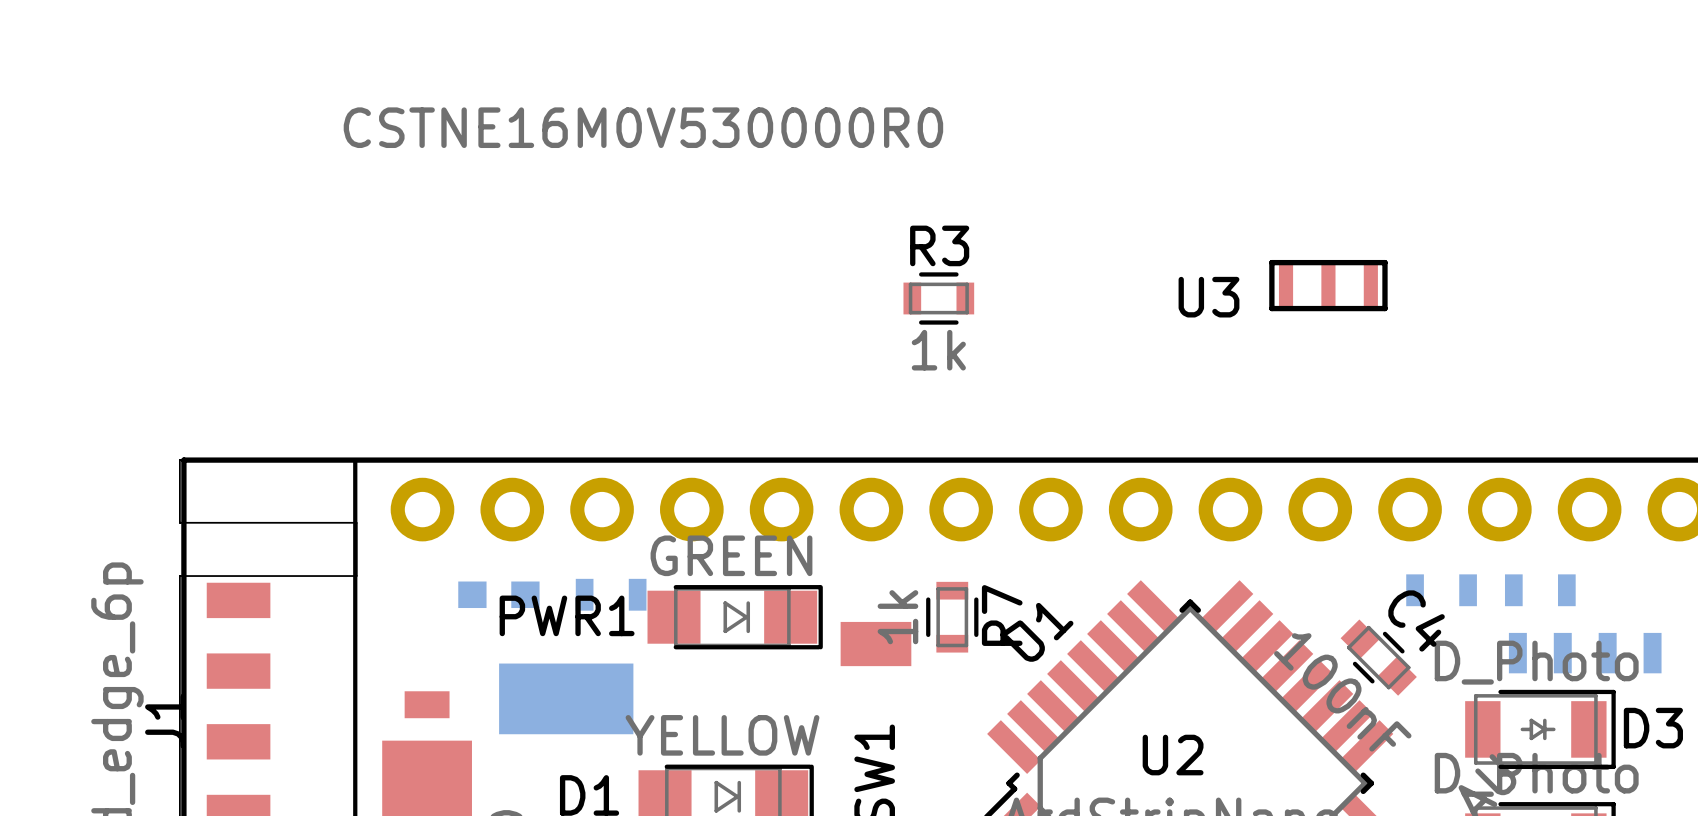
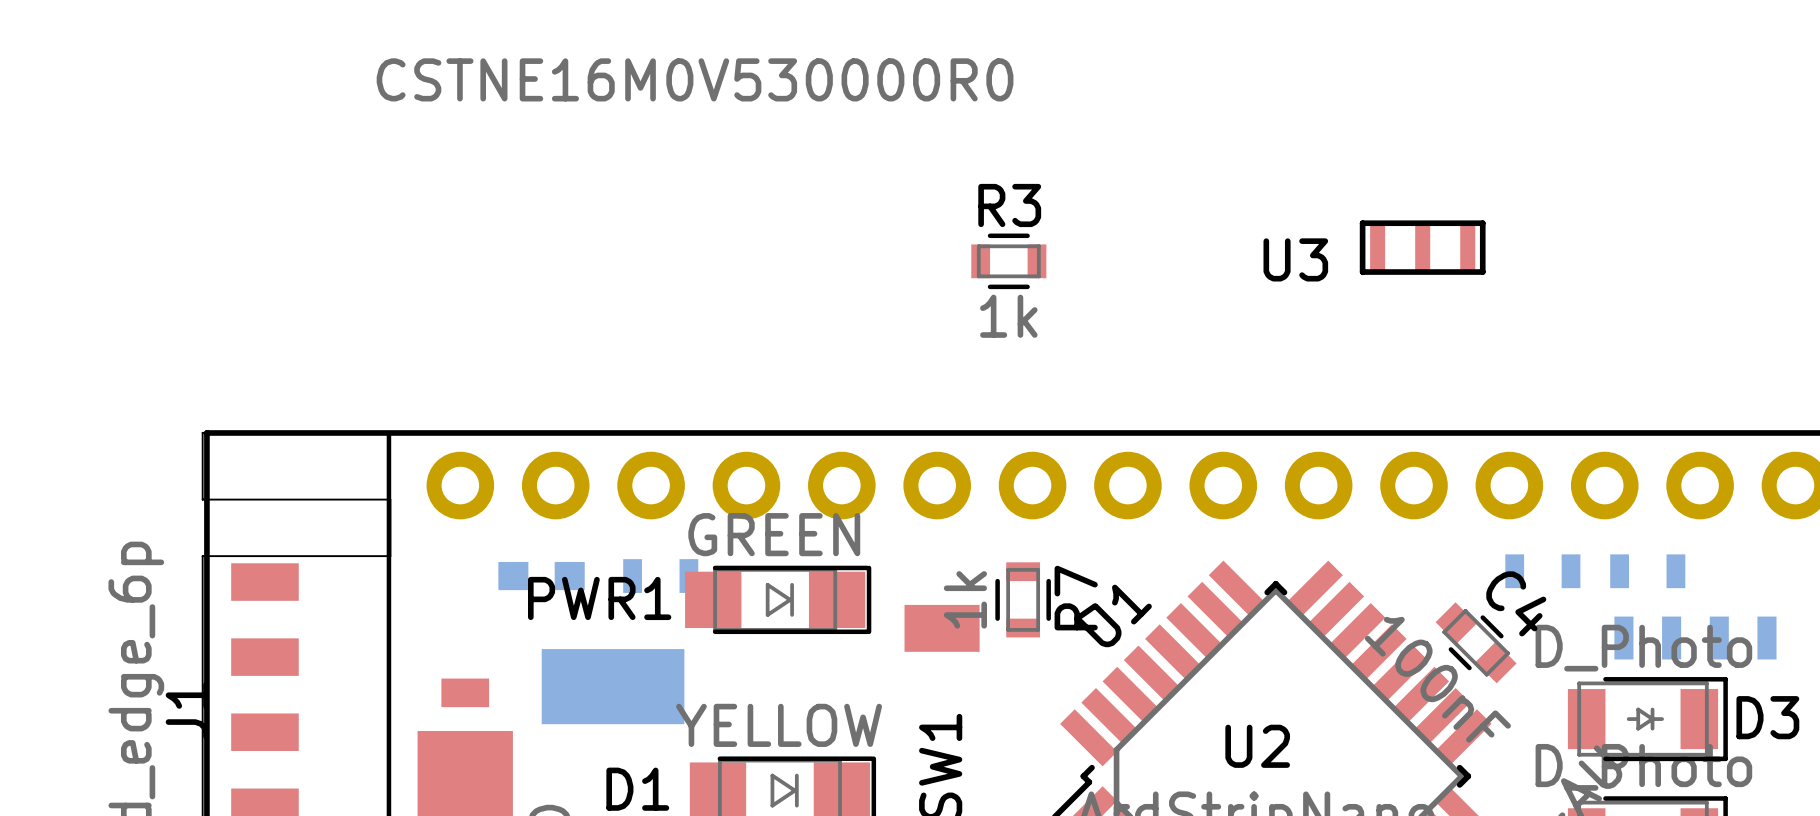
PWR1 position: (735, 617) -> (778, 599)

